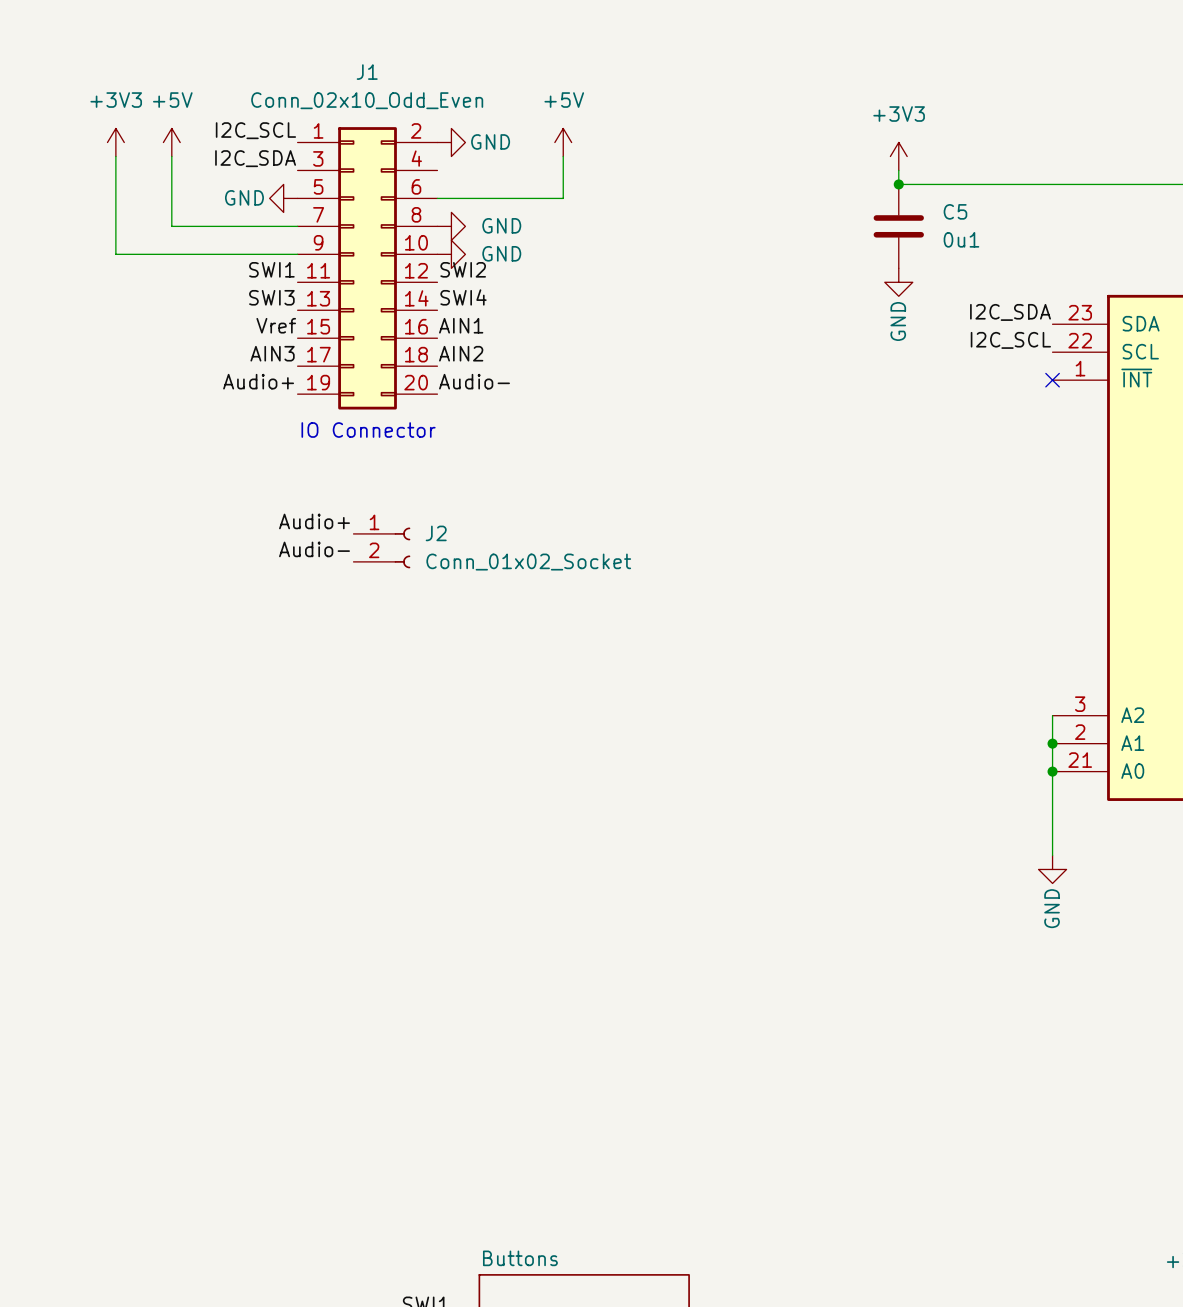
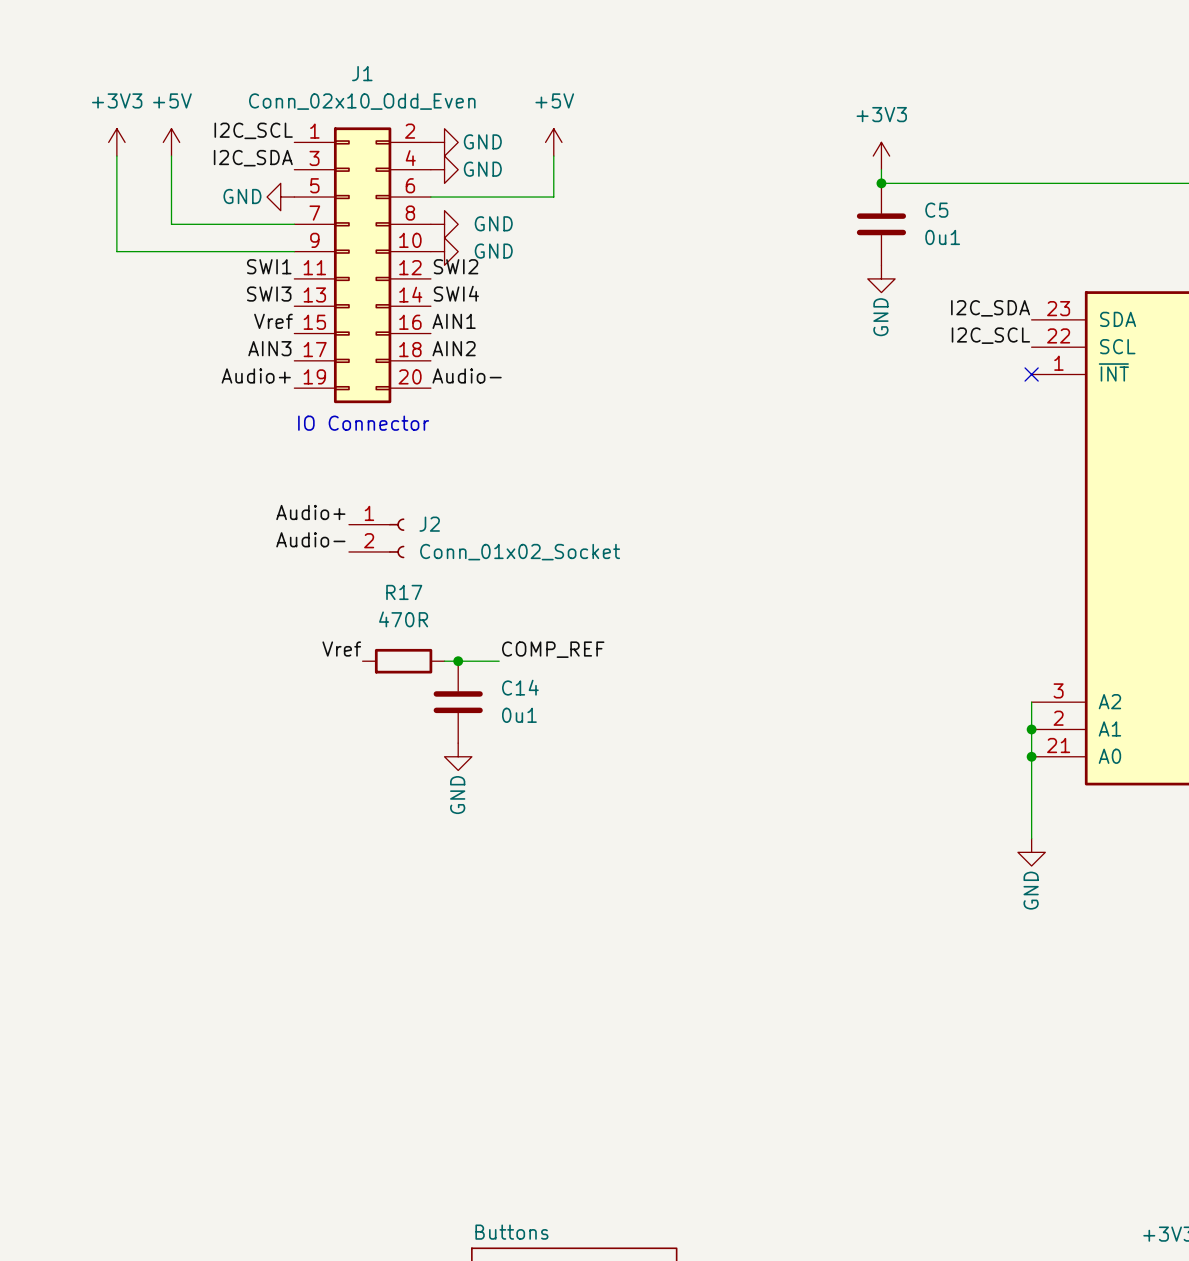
power symbol: none -> GND (444, 169)
label: none -> Vref (341, 649)
label: none -> COMP_REF (553, 649)
R17: none -> 470R (403, 661)
wire: none -> (444, 661) (499, 661)
junction: none -> (458, 661)
C14: none -> 0u1 (458, 702)
power symbol: none -> GND (458, 756)

